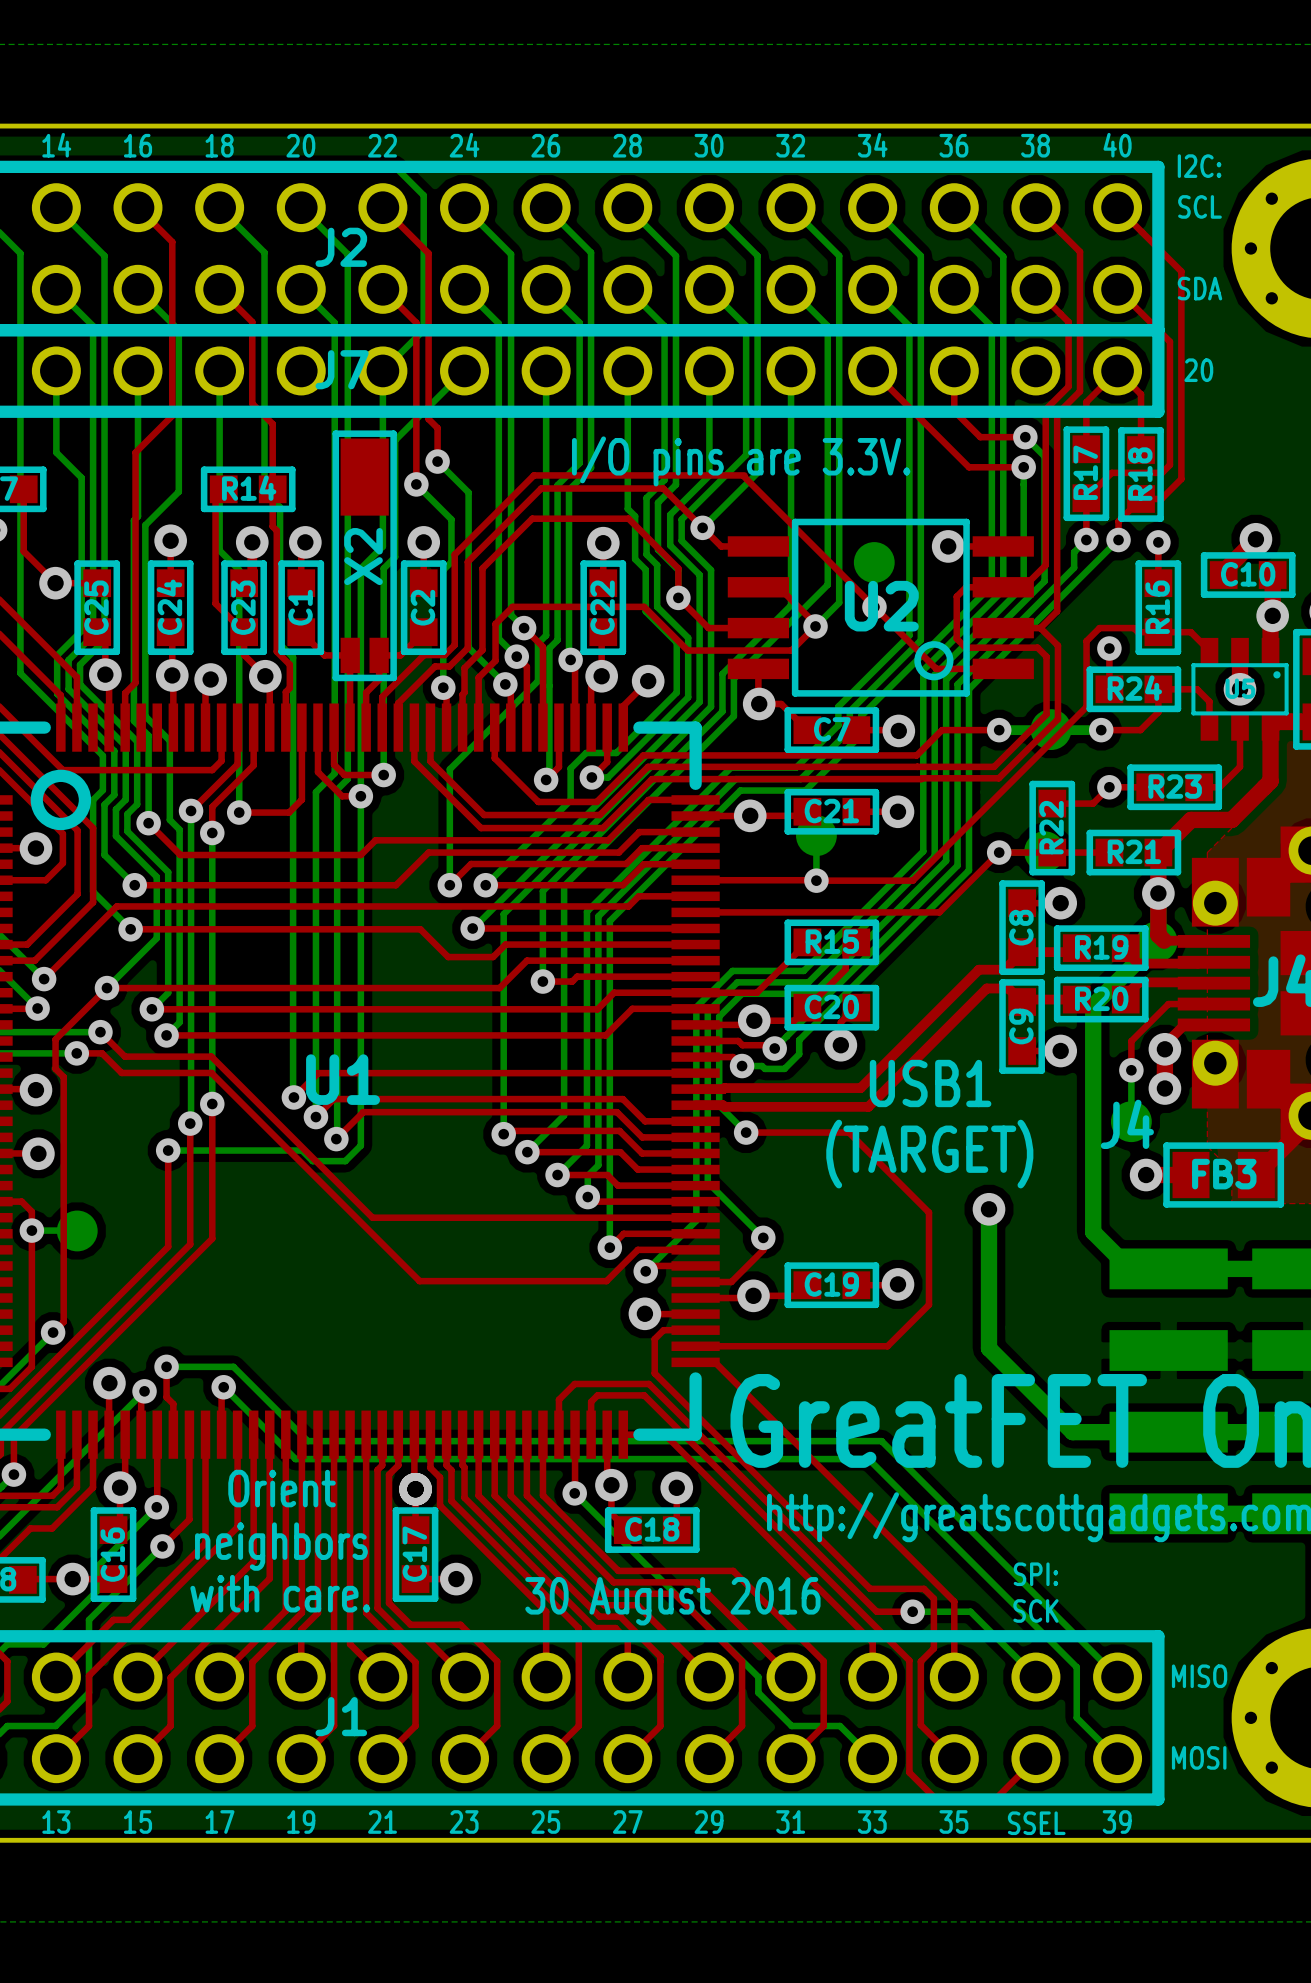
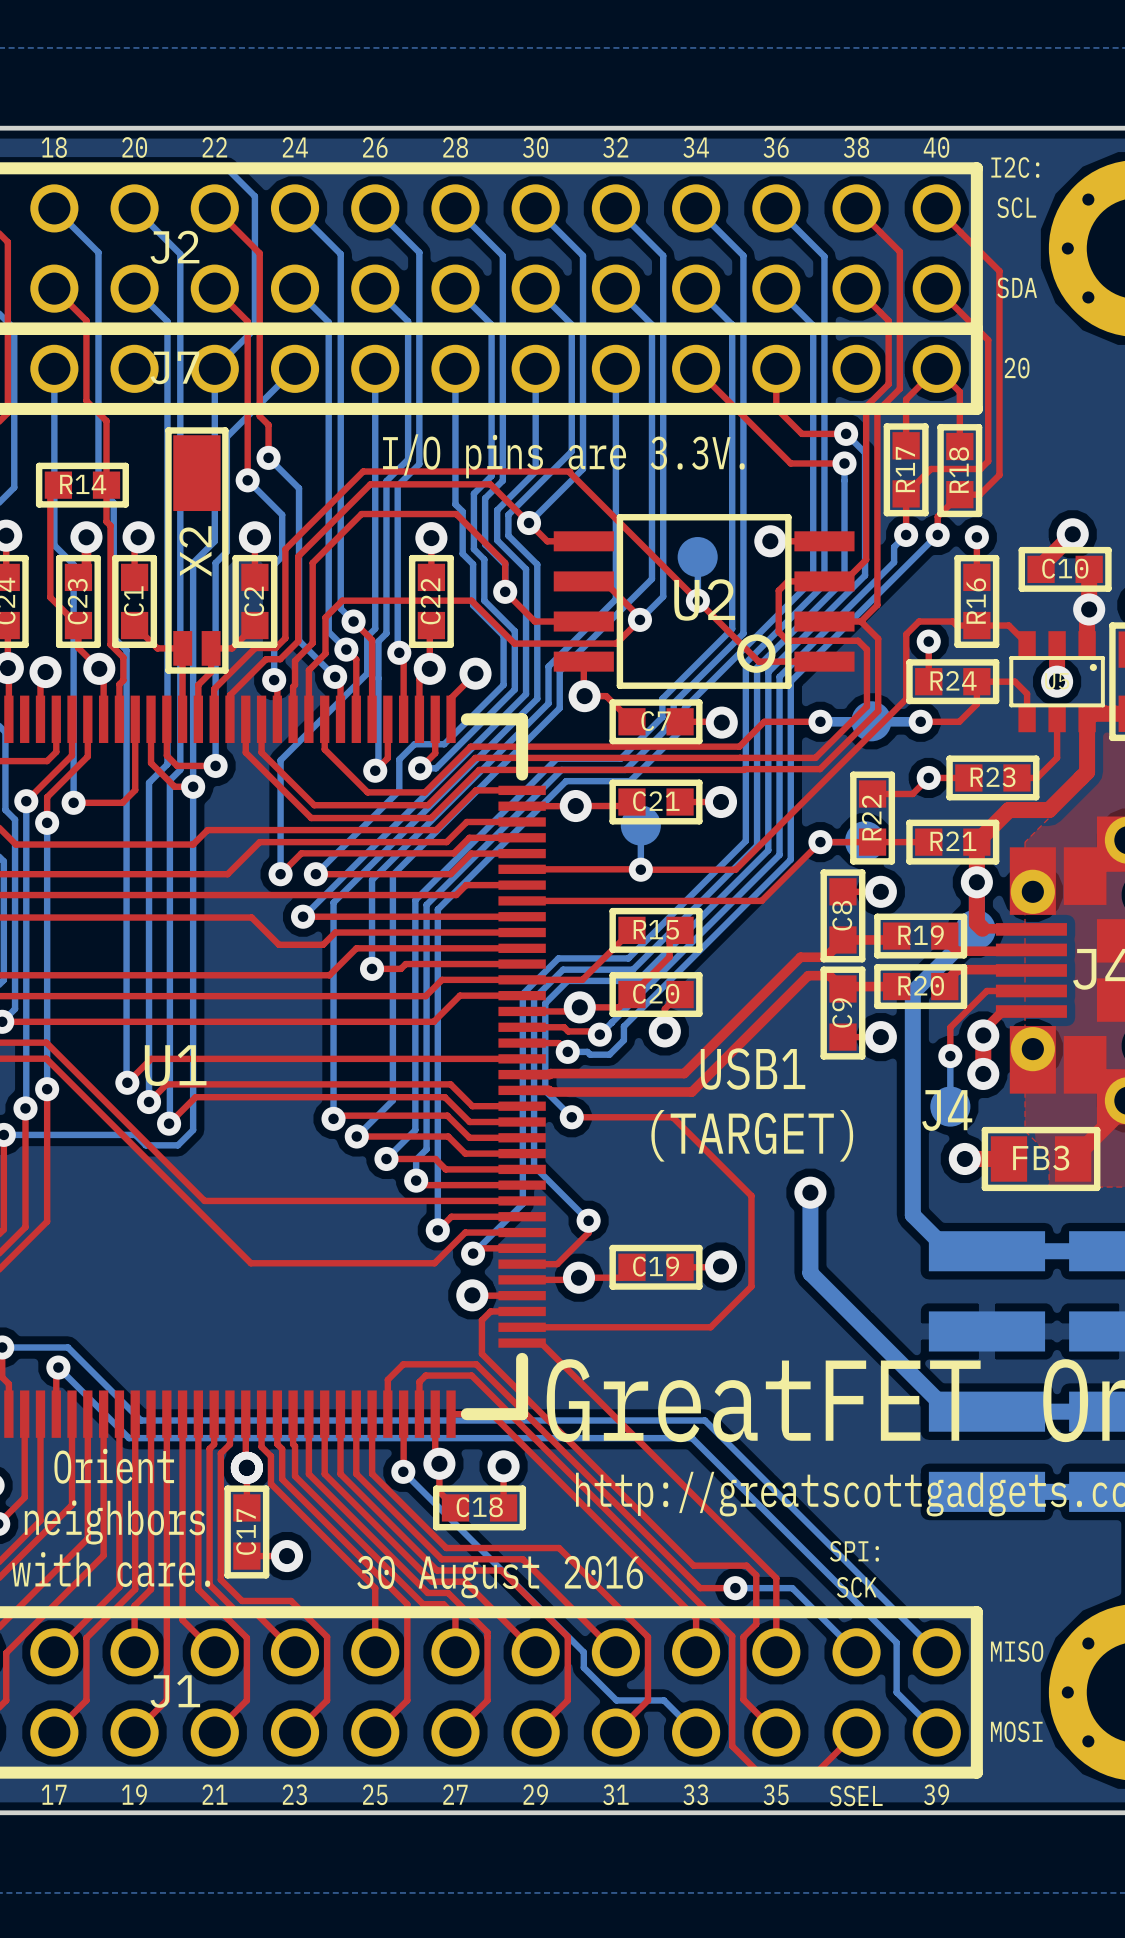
bottom track: (988, 1291) (988, 1348) (1072, 1432) (1129, 1432) -> (810, 1273) (948, 1411)

